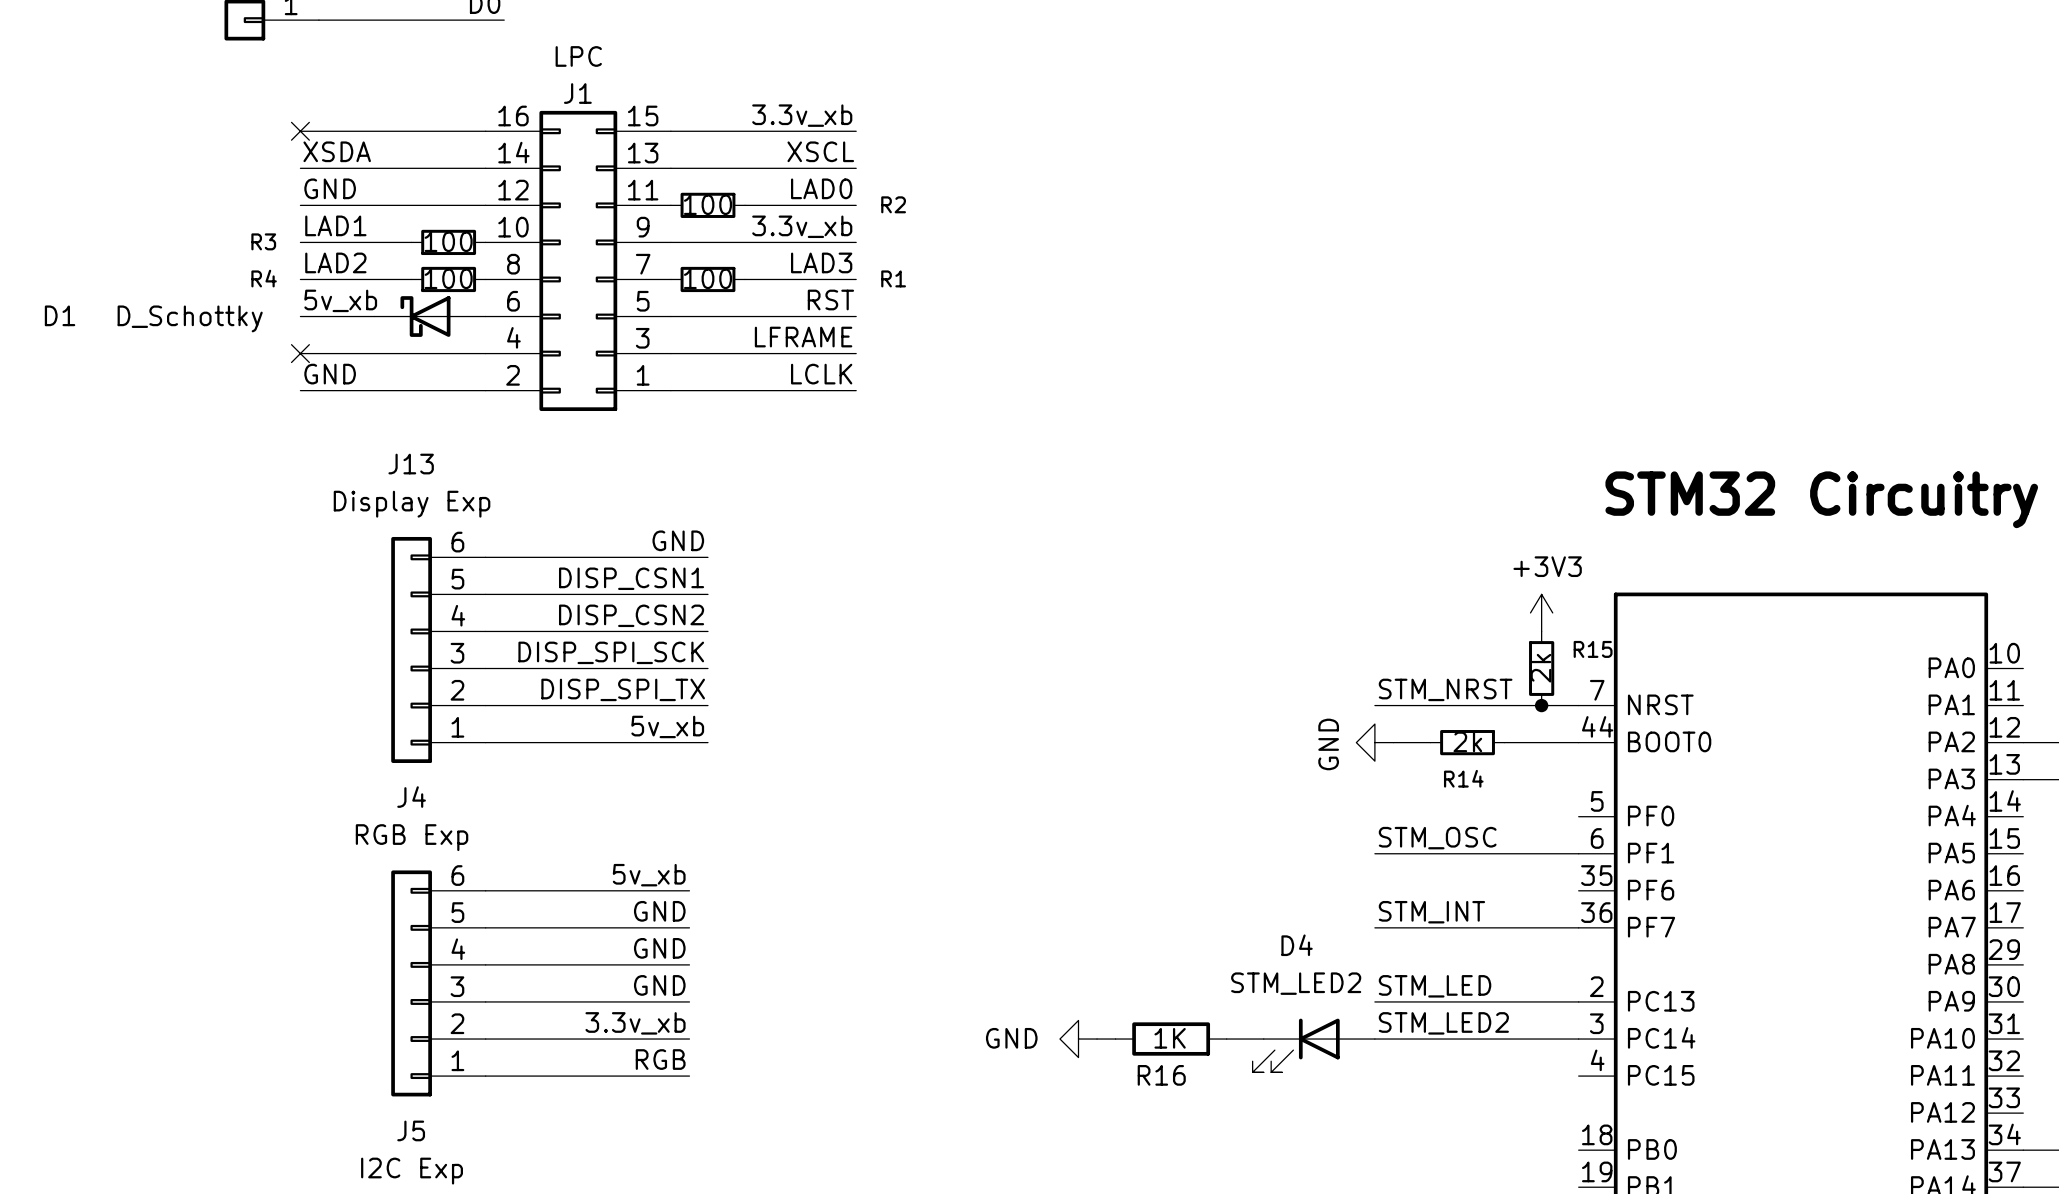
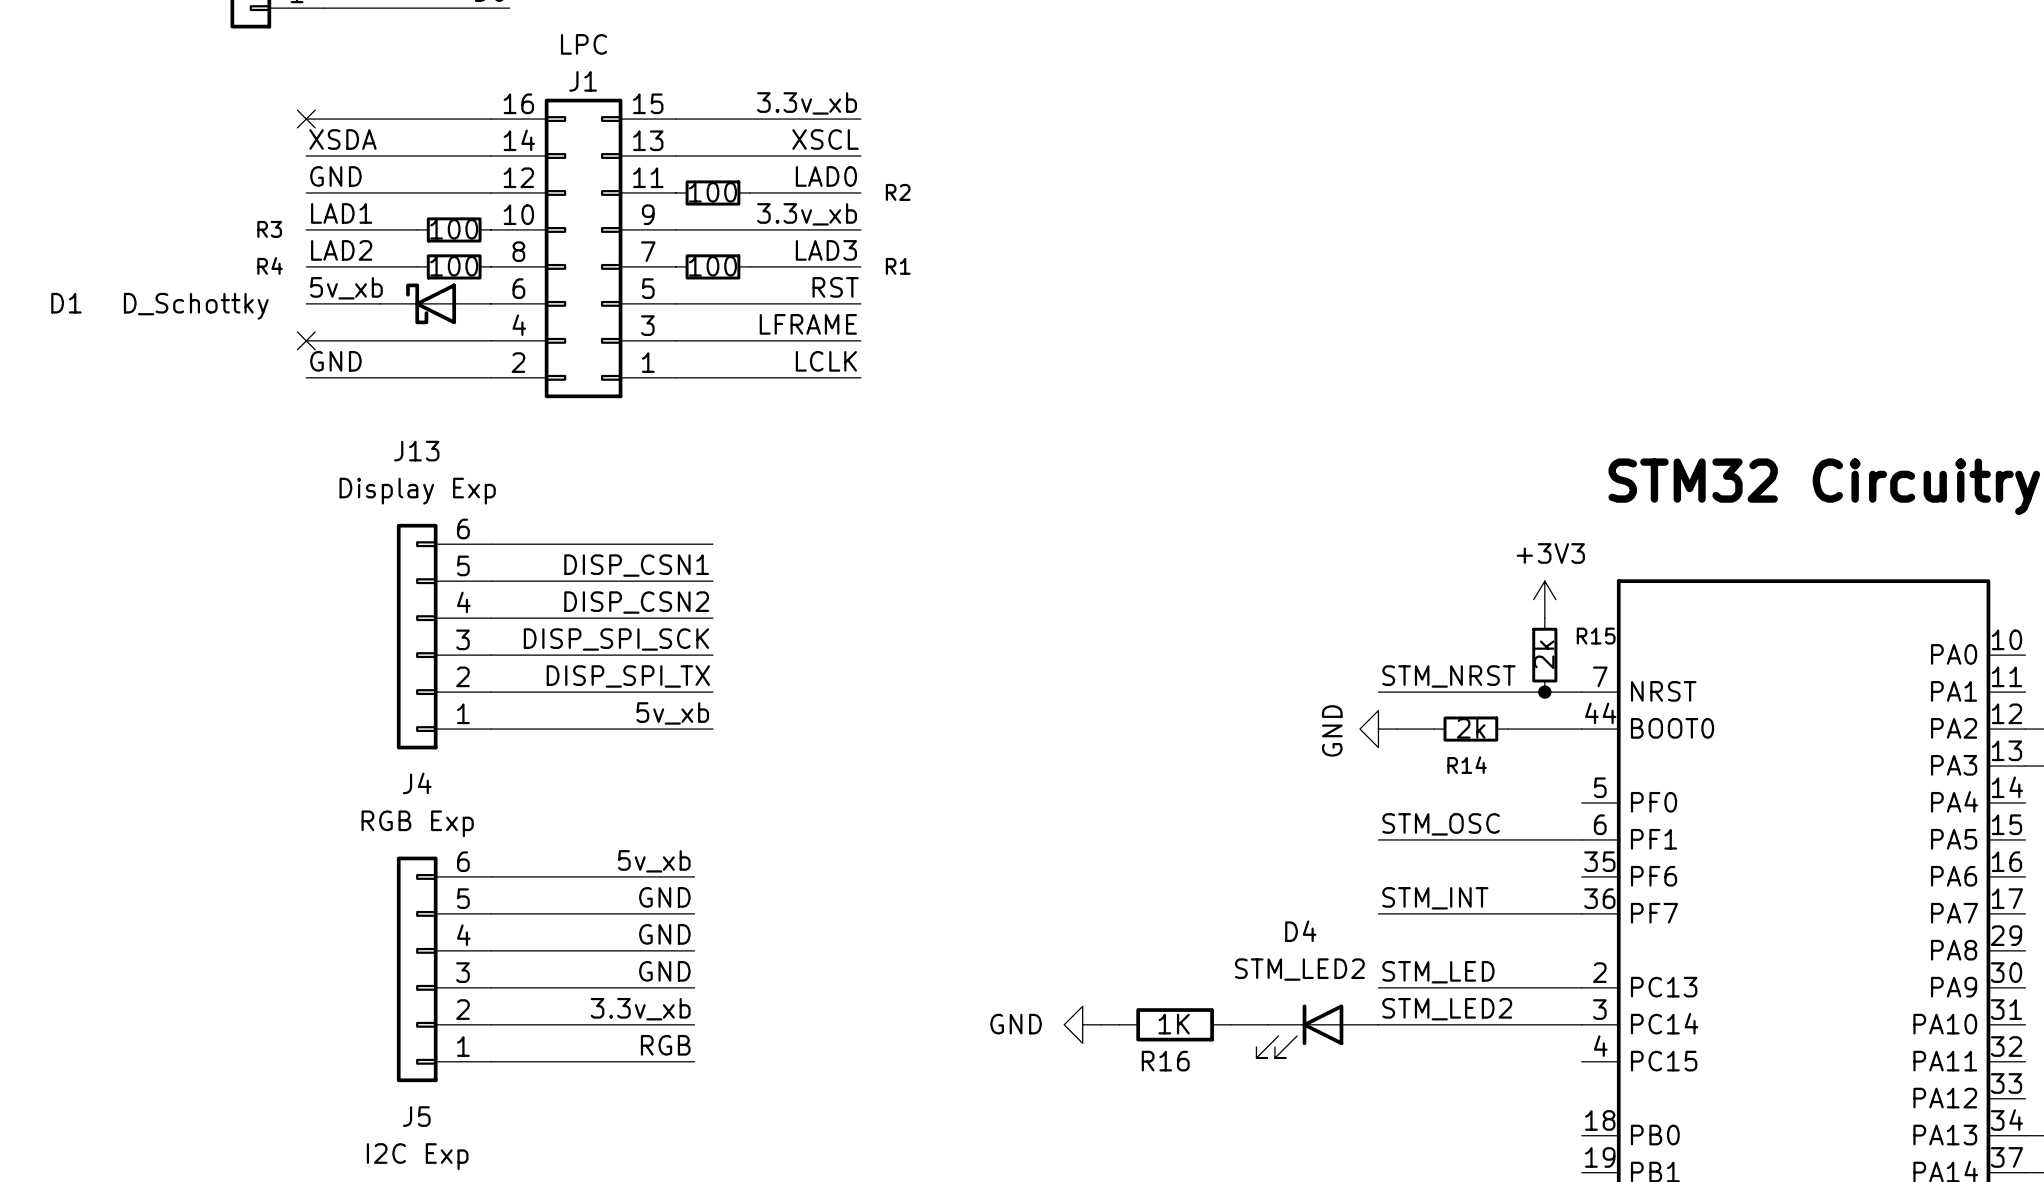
label: GND (678, 540) -> none

